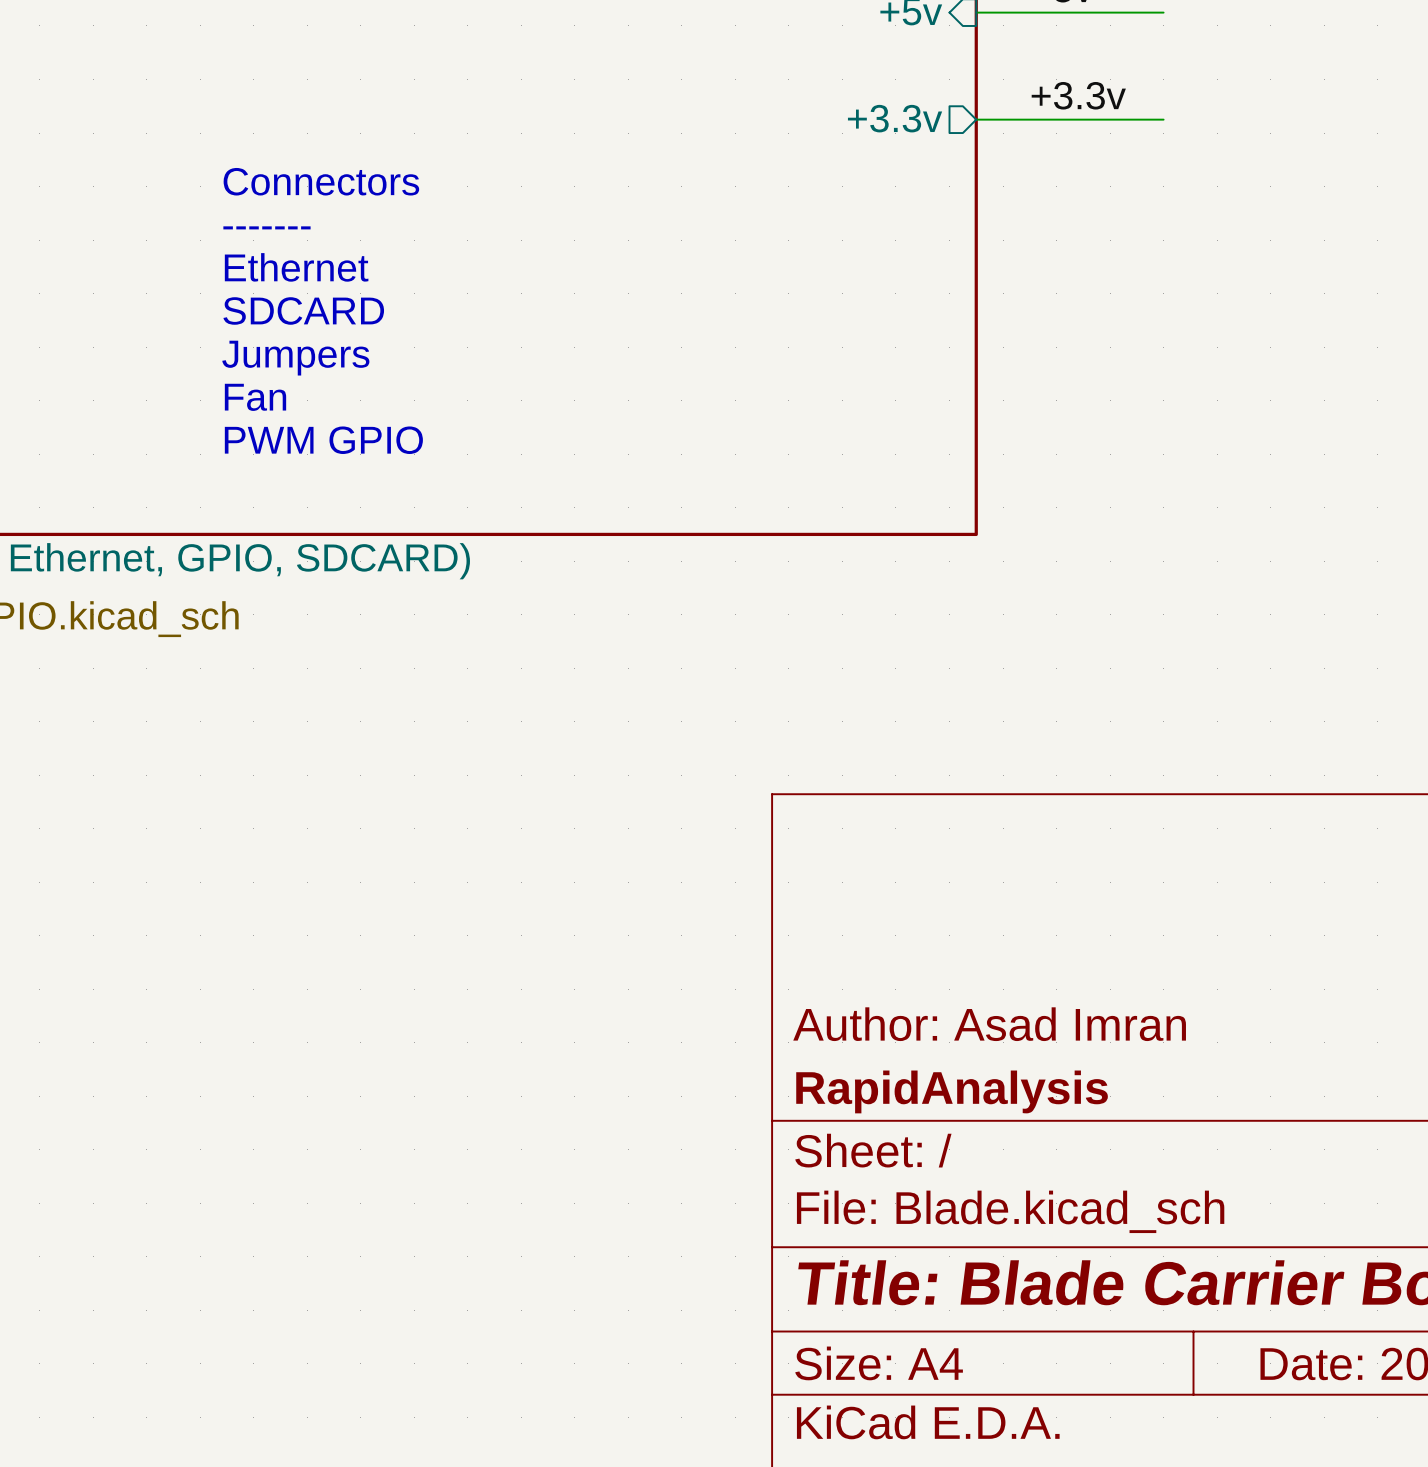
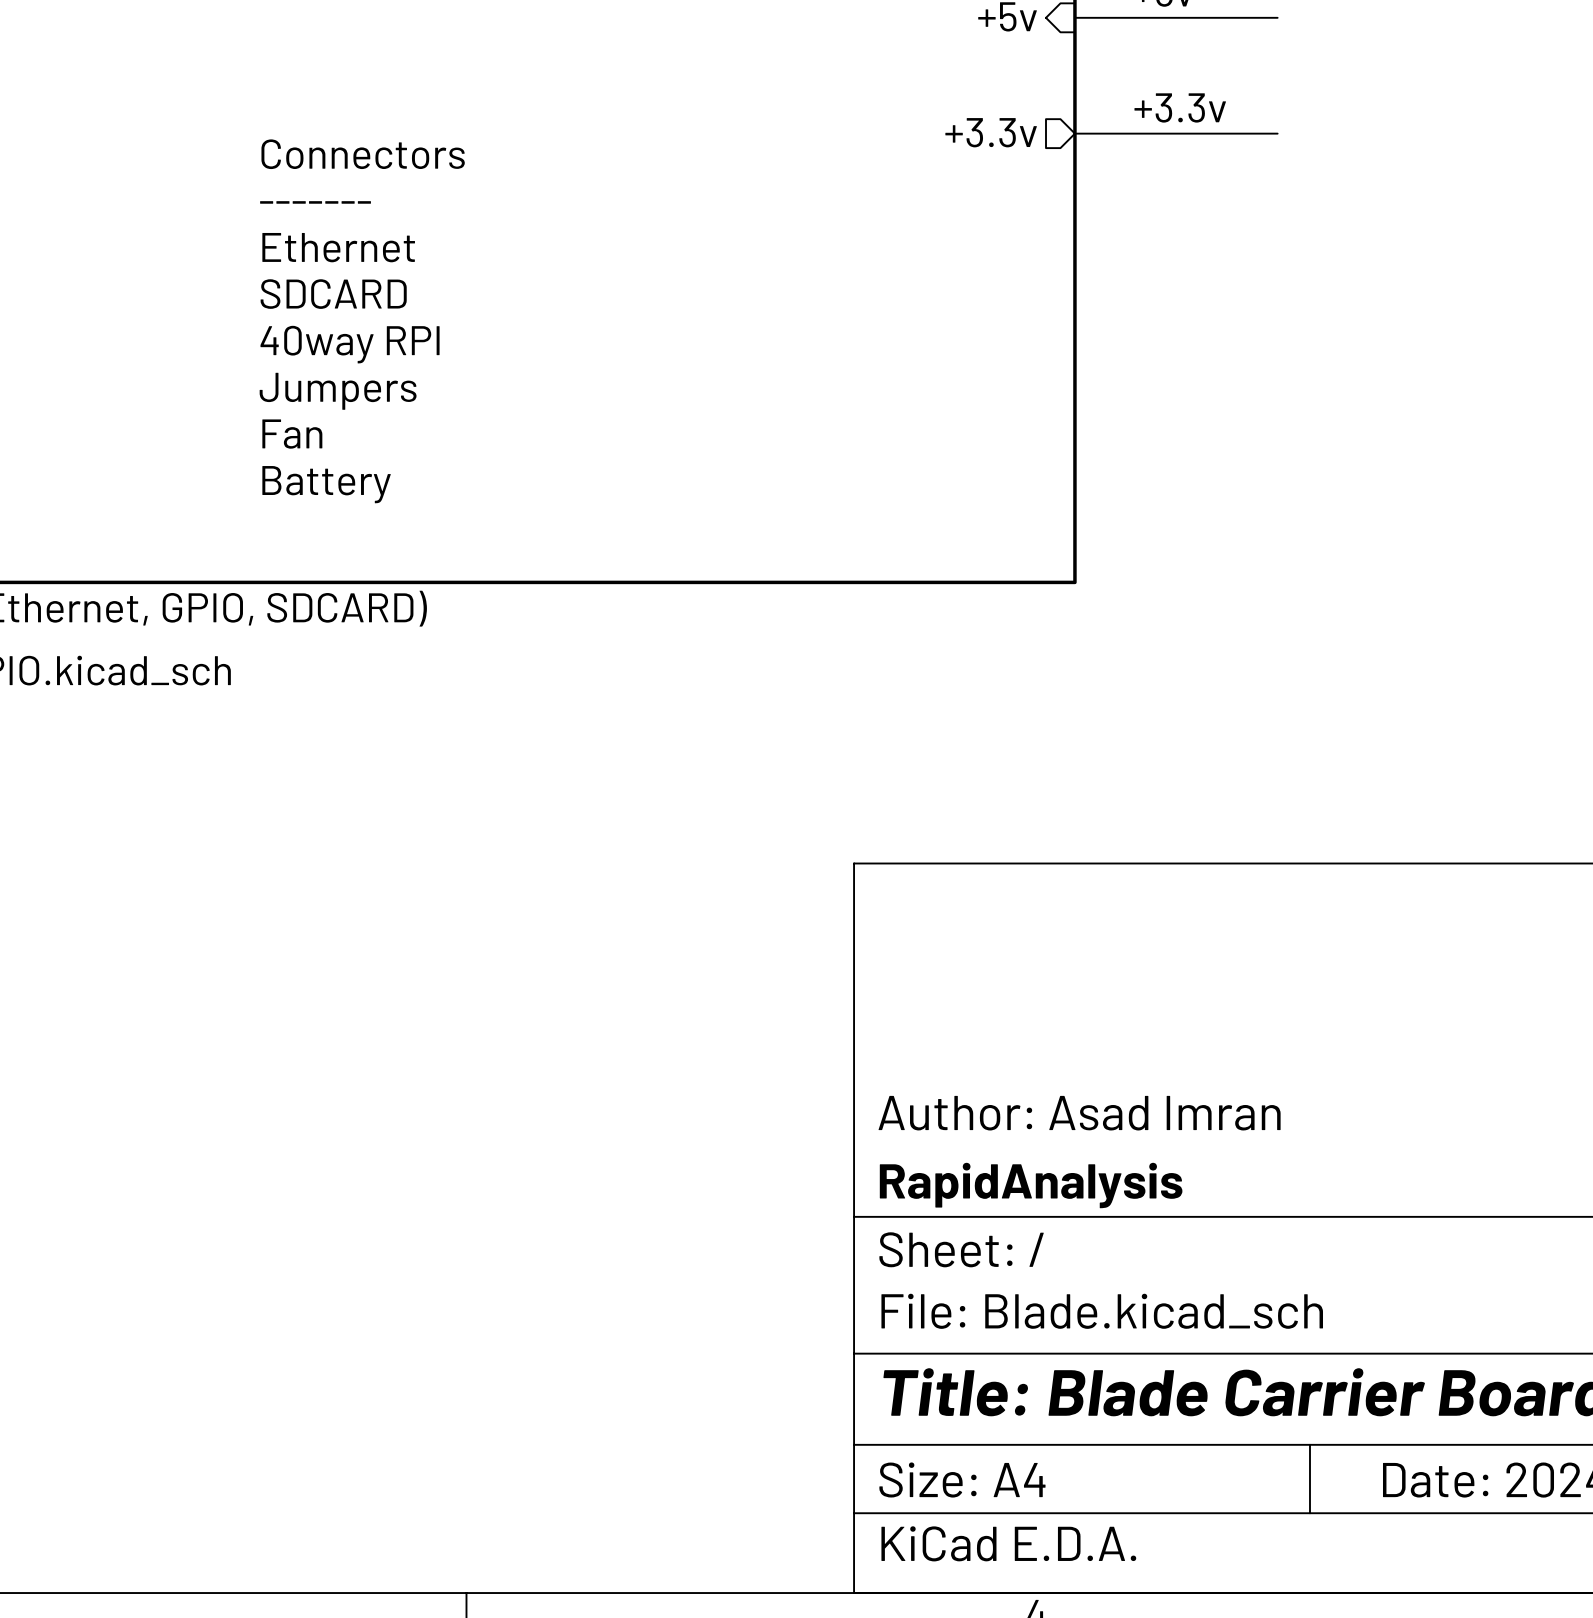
text: none -> Connectors (363, 154)
text: Connectors (321, 181) -> ------- (315, 202)
text: ------- (266, 227) -> Ethernet (338, 247)
text: Ethernet (296, 267) -> SDCARD (333, 294)
text: SDCARD (303, 310) -> 40way RPI (350, 344)
text: PWM GPIO (323, 440) -> Battery (326, 484)

